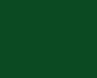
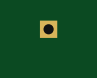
part: none -> (48, 29)

